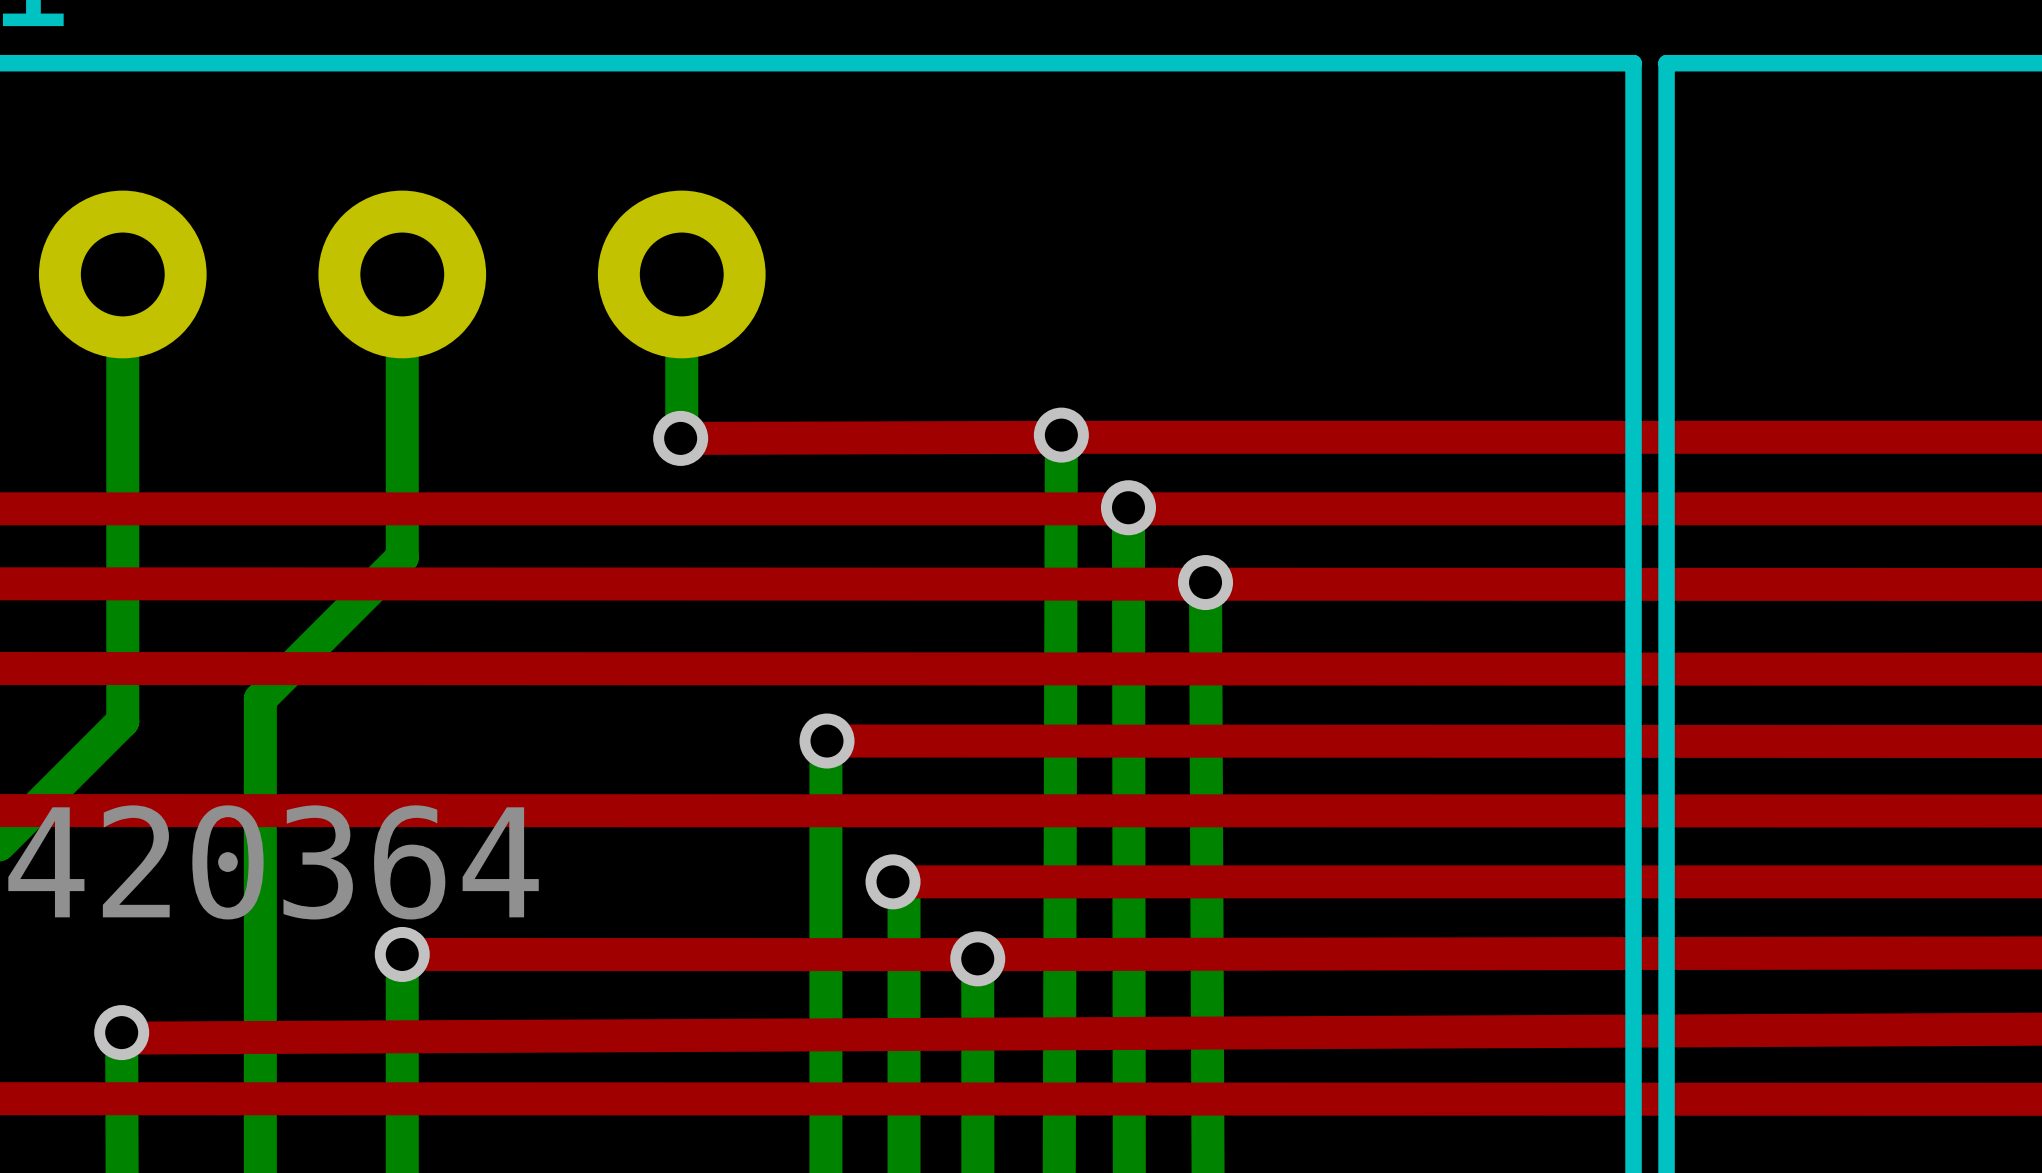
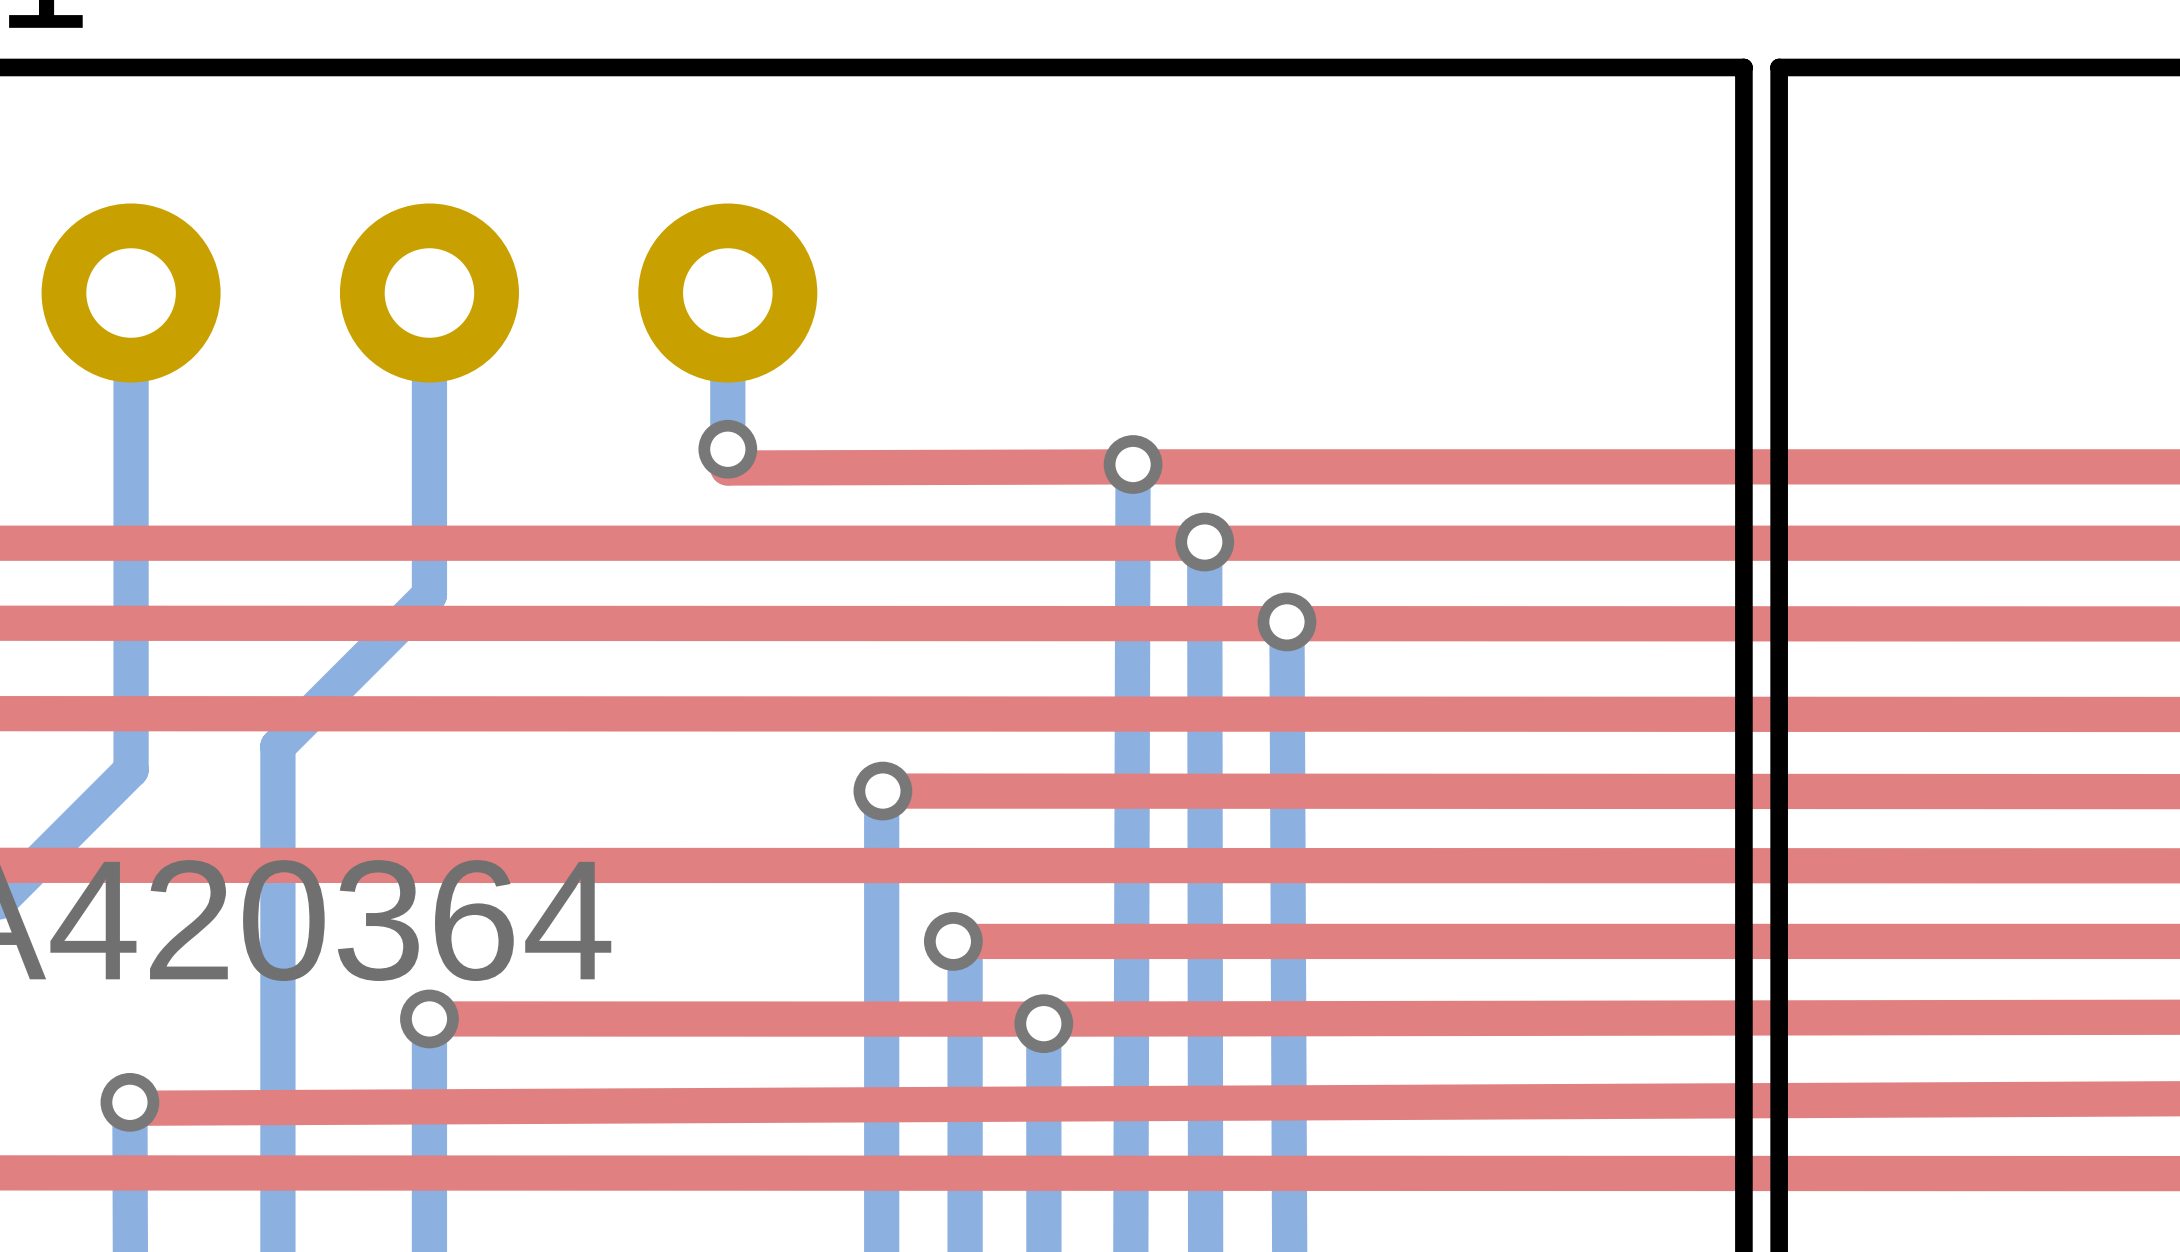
via position: (680, 438) -> (727, 449)

